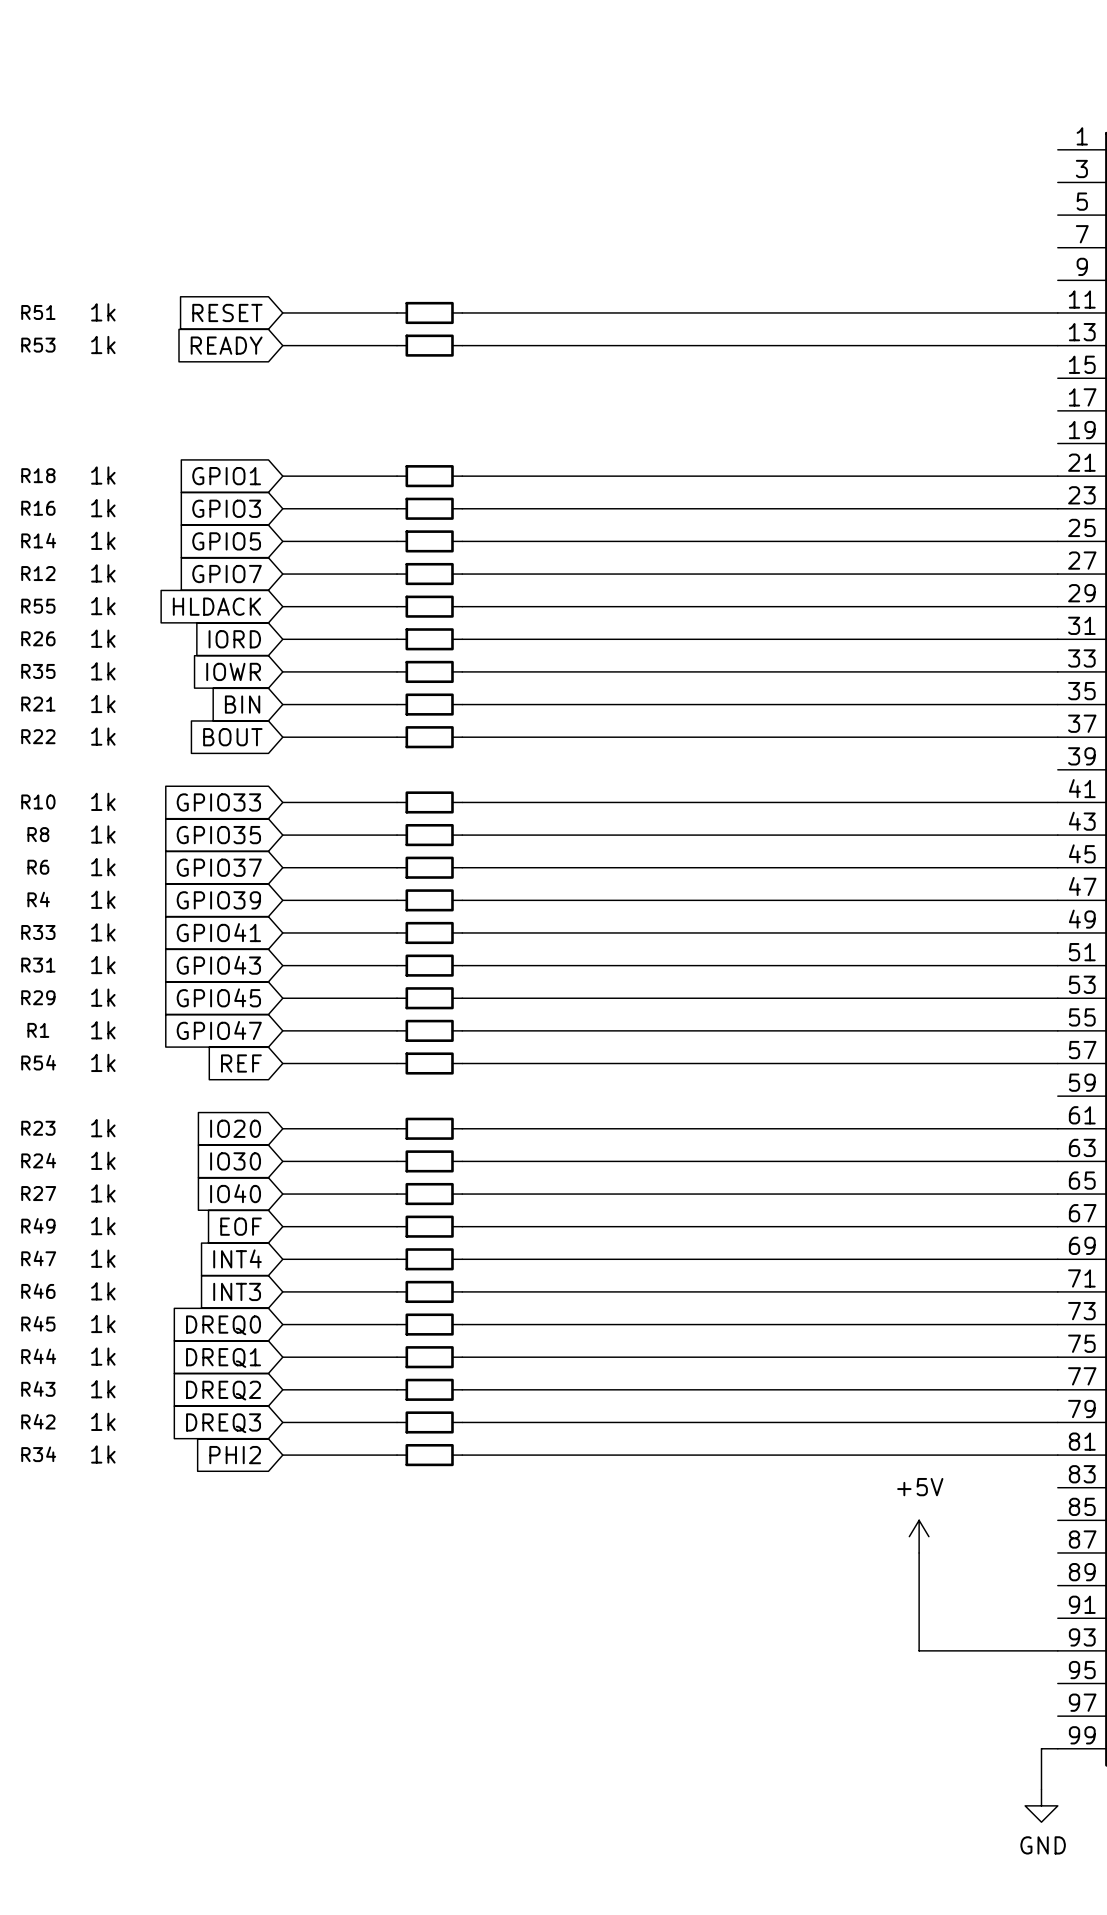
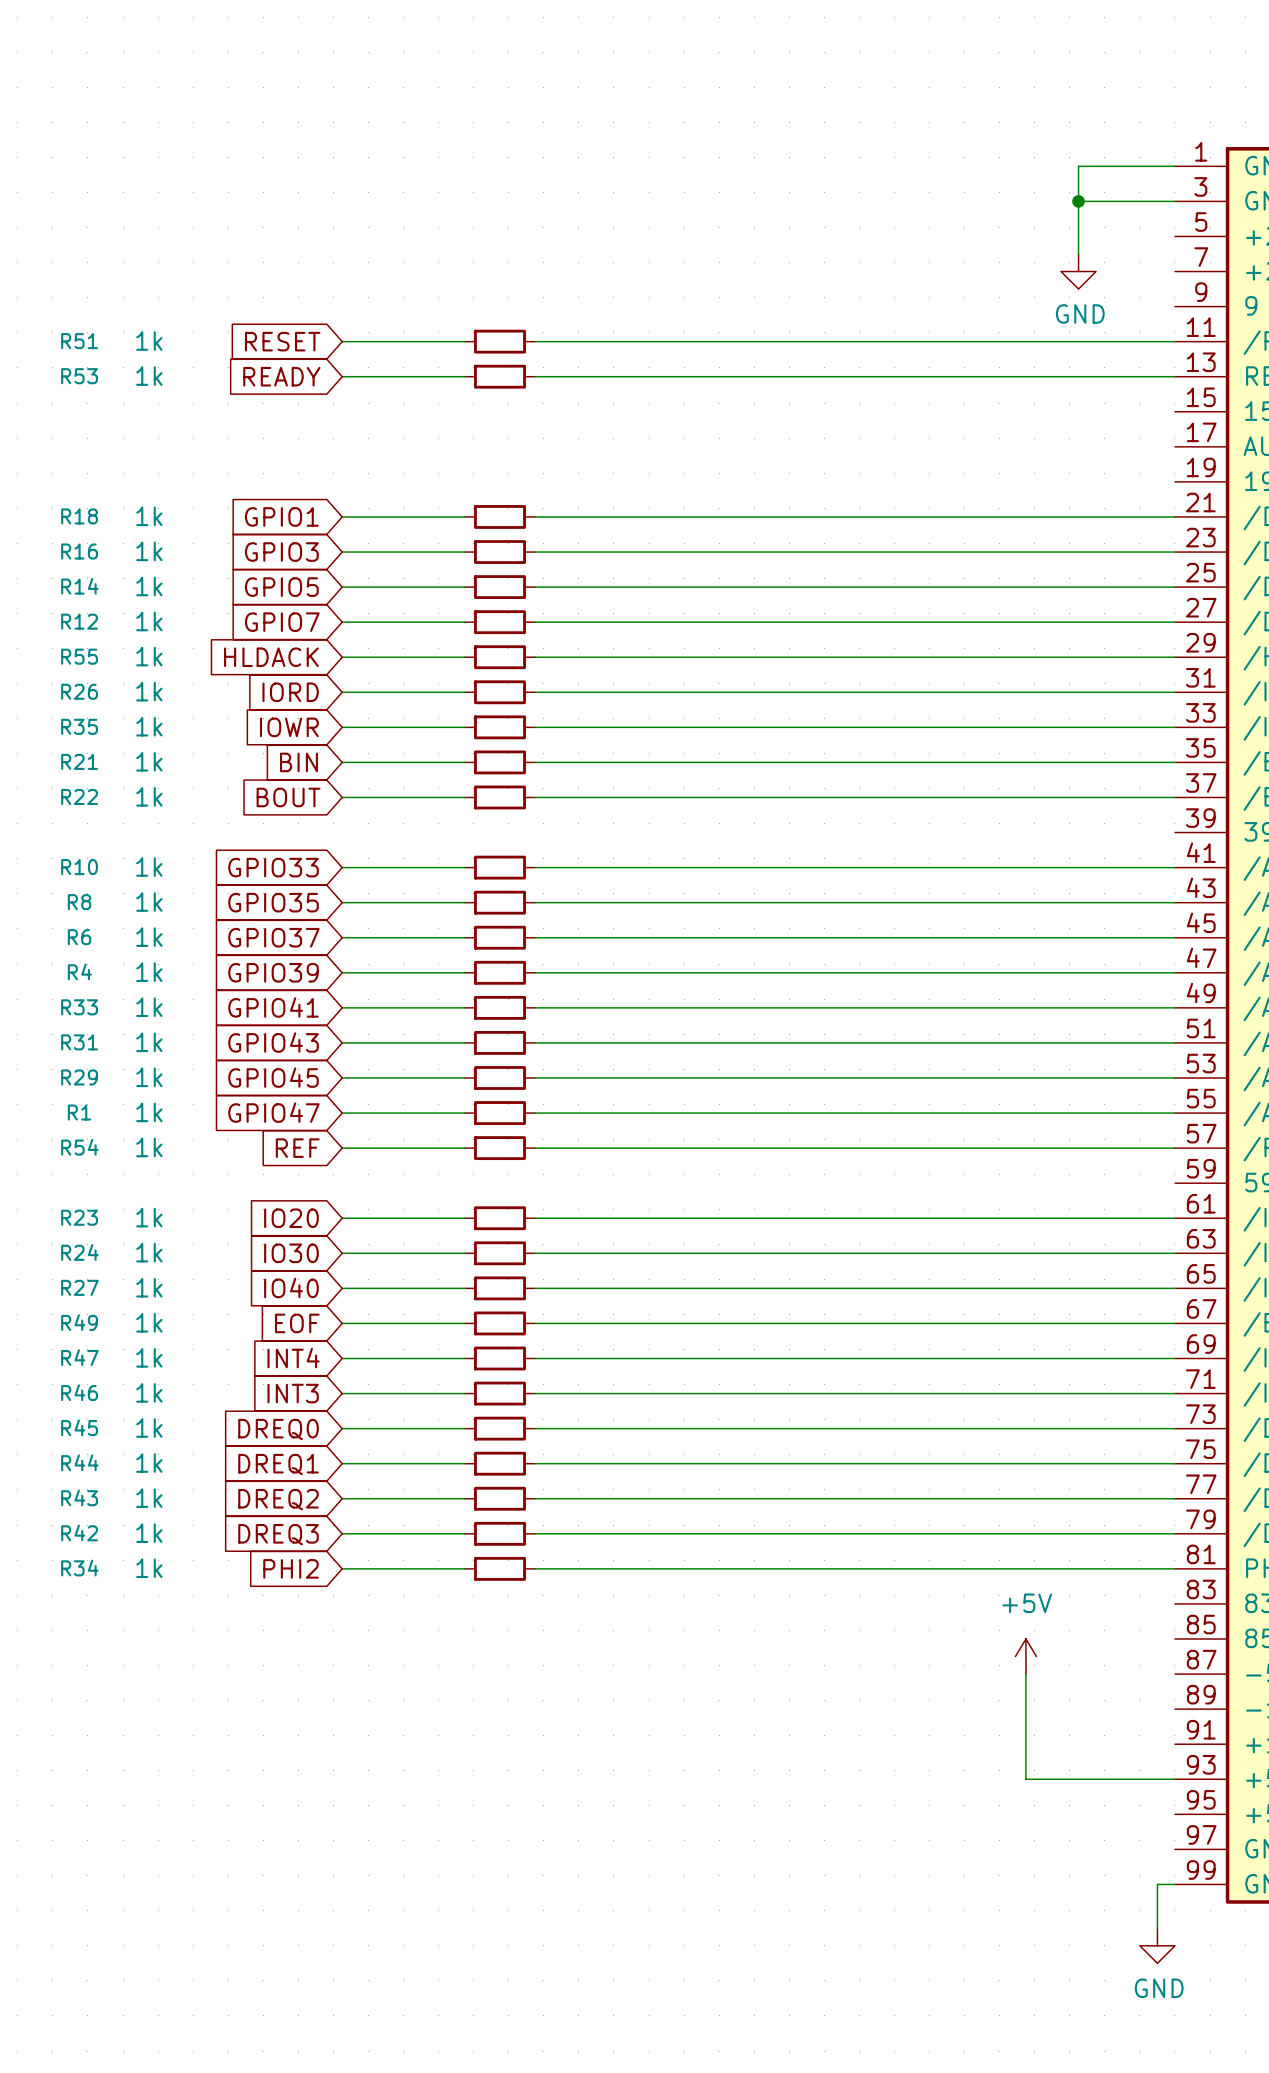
wire: none -> (1174, 166) (1078, 166) (1078, 253)
wire: none -> (1078, 201) (1174, 201)
junction: none -> (1078, 201)
power symbol: none -> GND (1078, 271)

